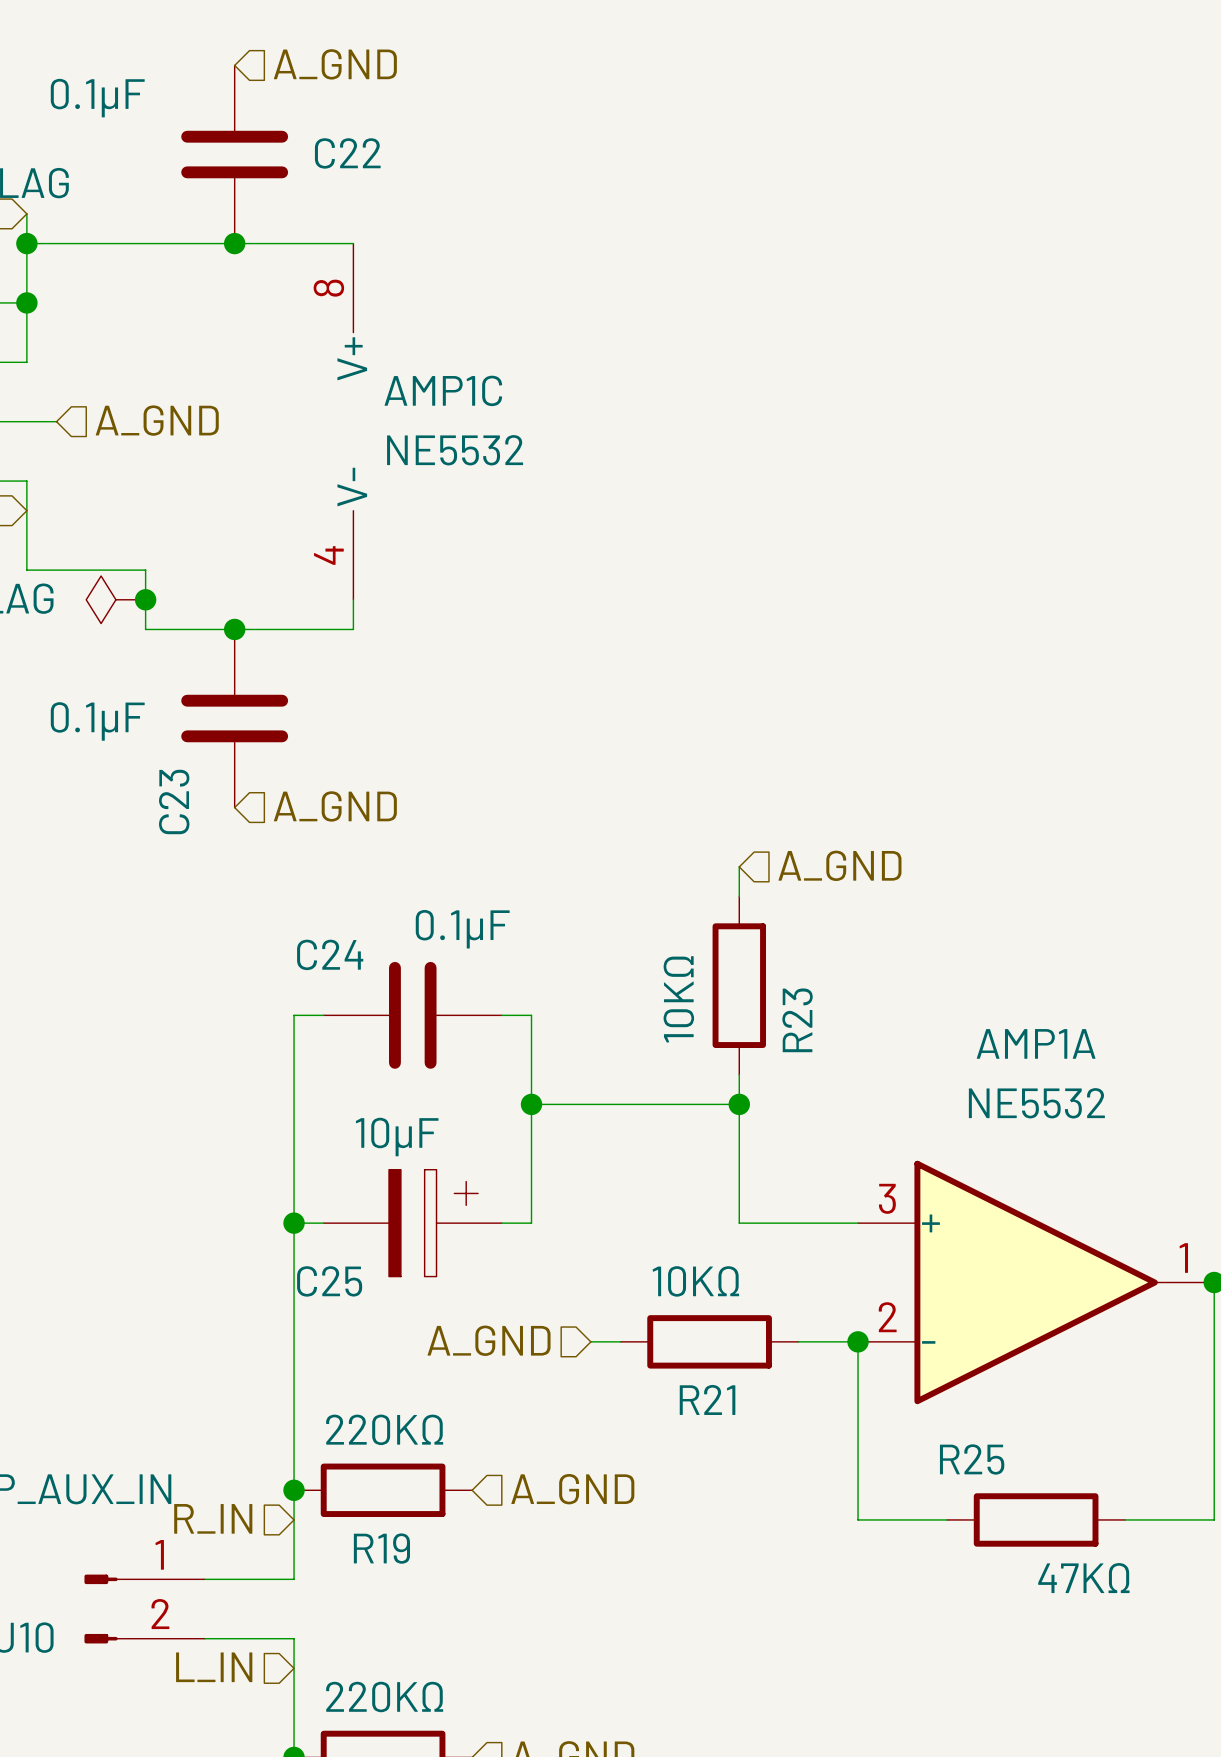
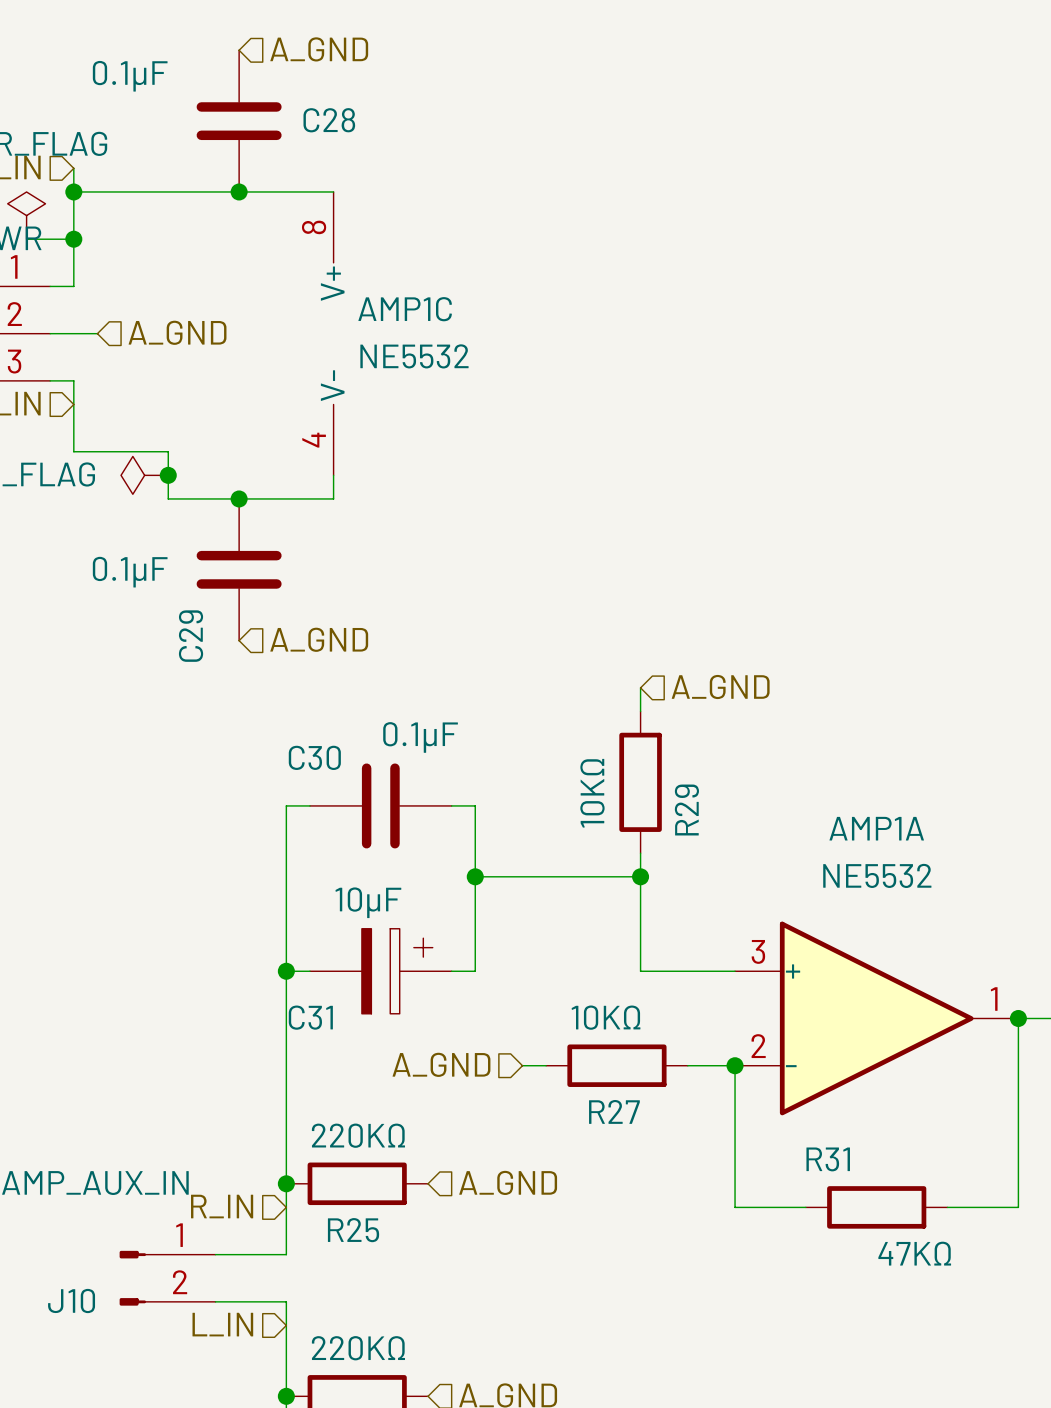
C22 name: C22 (347, 153) -> C28 (329, 120)
C23 name: C23 (174, 801) -> C29 (191, 636)
C24 name: C24 (330, 954) -> C30 (314, 757)
R23 name: R23 (797, 1020) -> R29 (686, 810)
C25 name: C25 (329, 1281) -> C31 (310, 1017)
R21 name: R21 (707, 1399) -> R27 (614, 1111)
R25 name: R25 (972, 1459) -> R31 (828, 1159)
R19 name: R19 (381, 1548) -> R25 (353, 1230)

